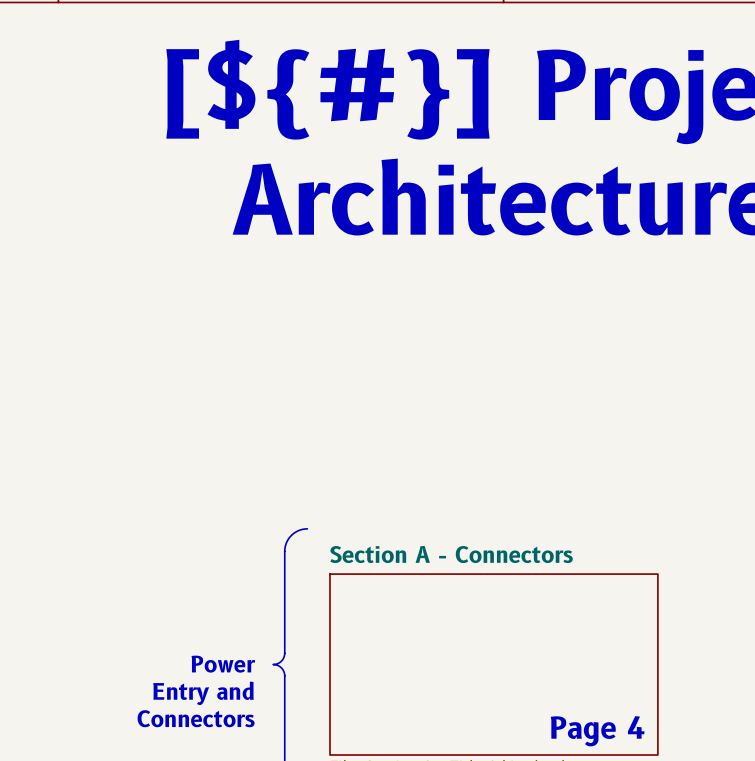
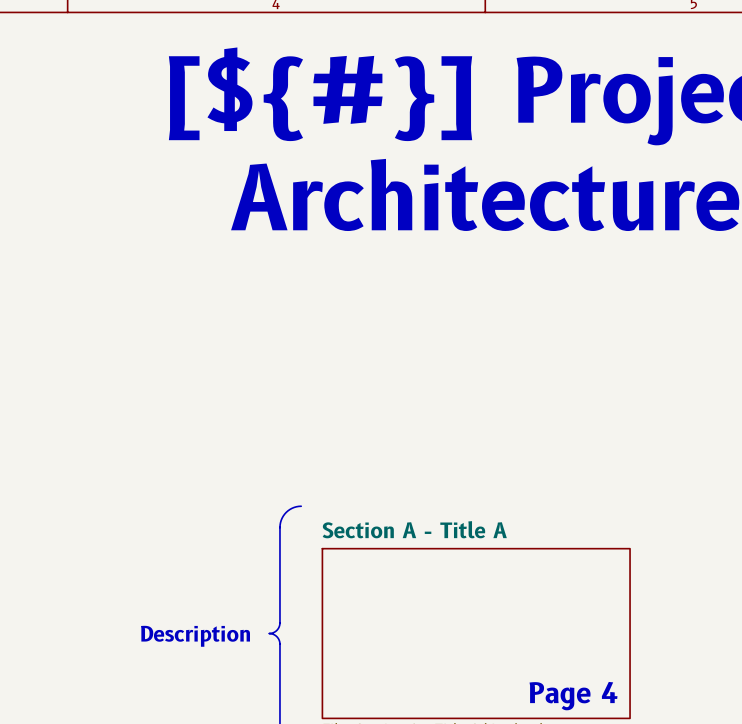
sheet Section A - Connectors name: Section A - Connectors (451, 554) -> Section A - Title A (414, 529)
text: Power (223, 664) -> Description (195, 636)
text: Entry and (203, 693) -> none
text: Connectors (196, 718) -> none

